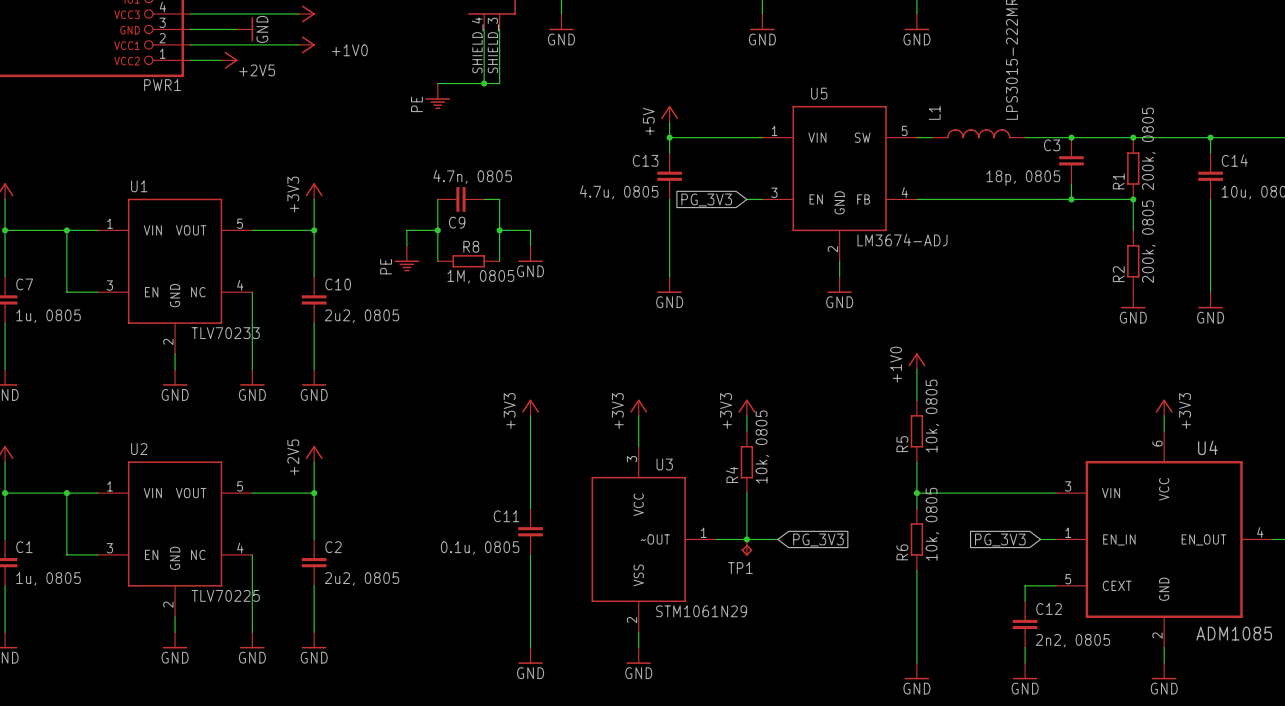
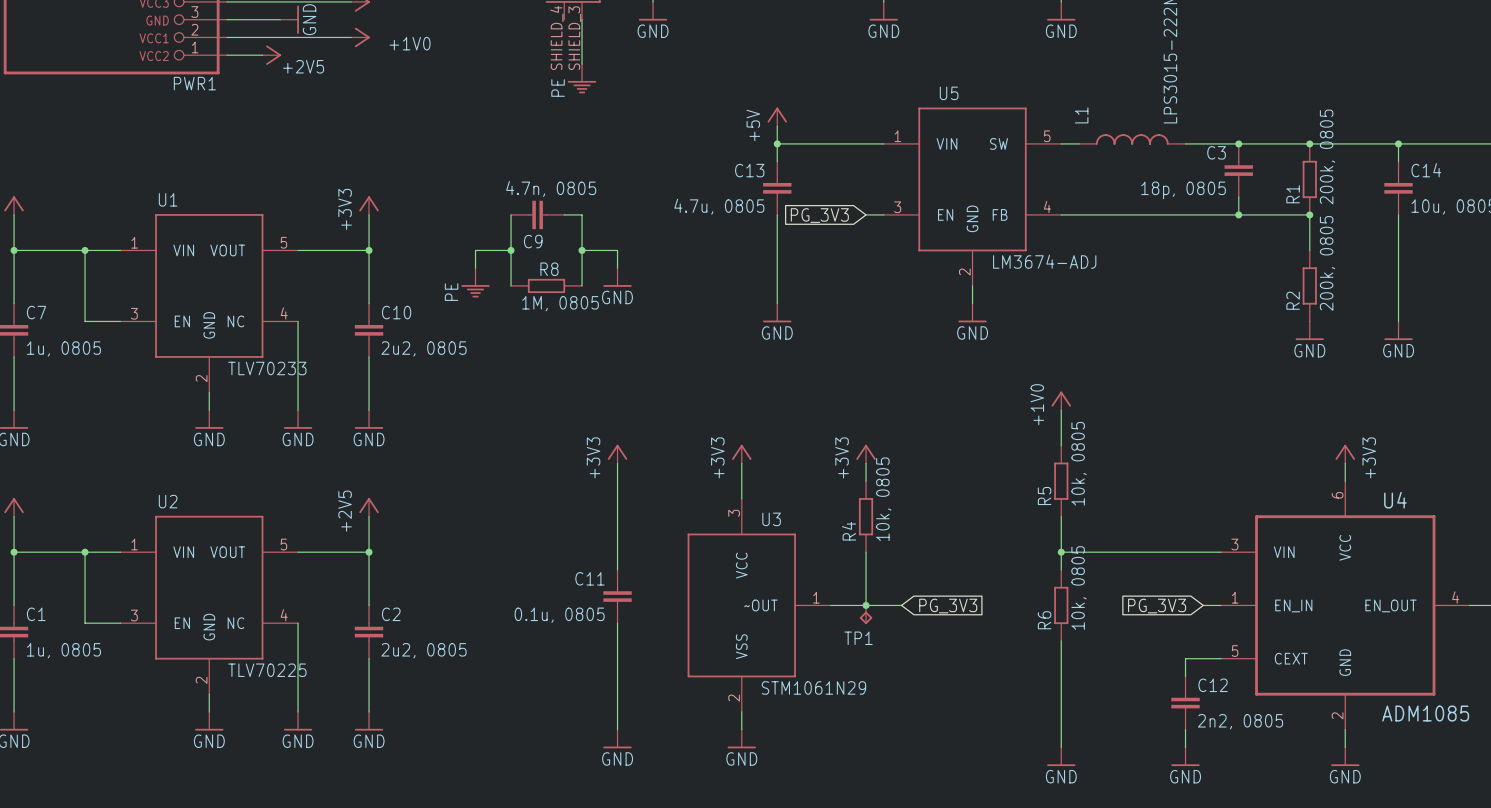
wire: (484, 29) (484, 83) -> none
wire: (499, 68) (499, 83) (437, 83) -> none
junction: (484, 83) -> none
power symbol position: PE (437, 96) -> PE (582, 78)

